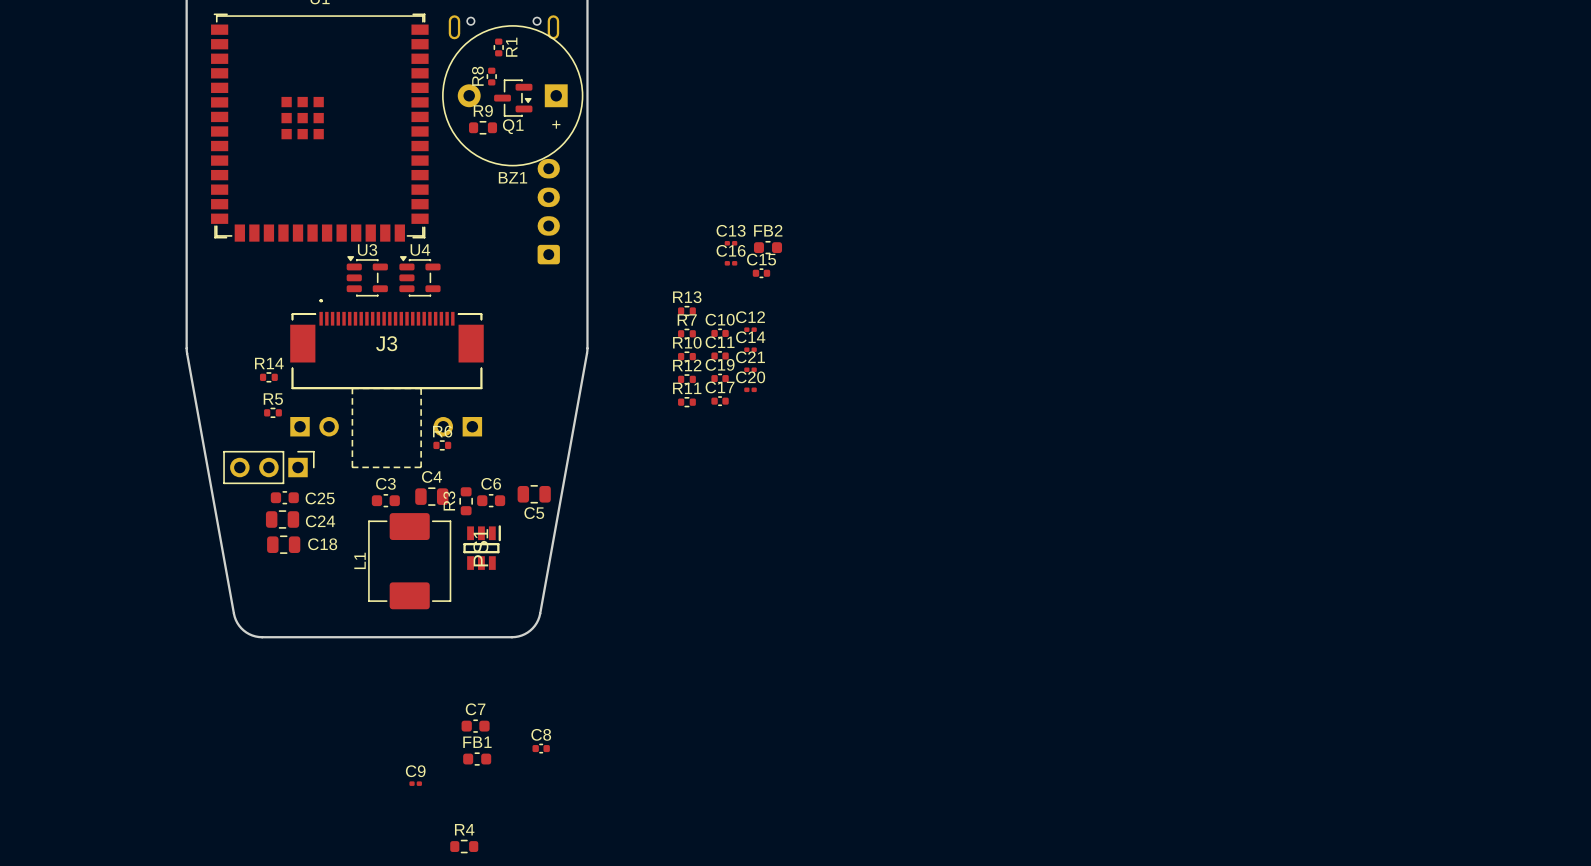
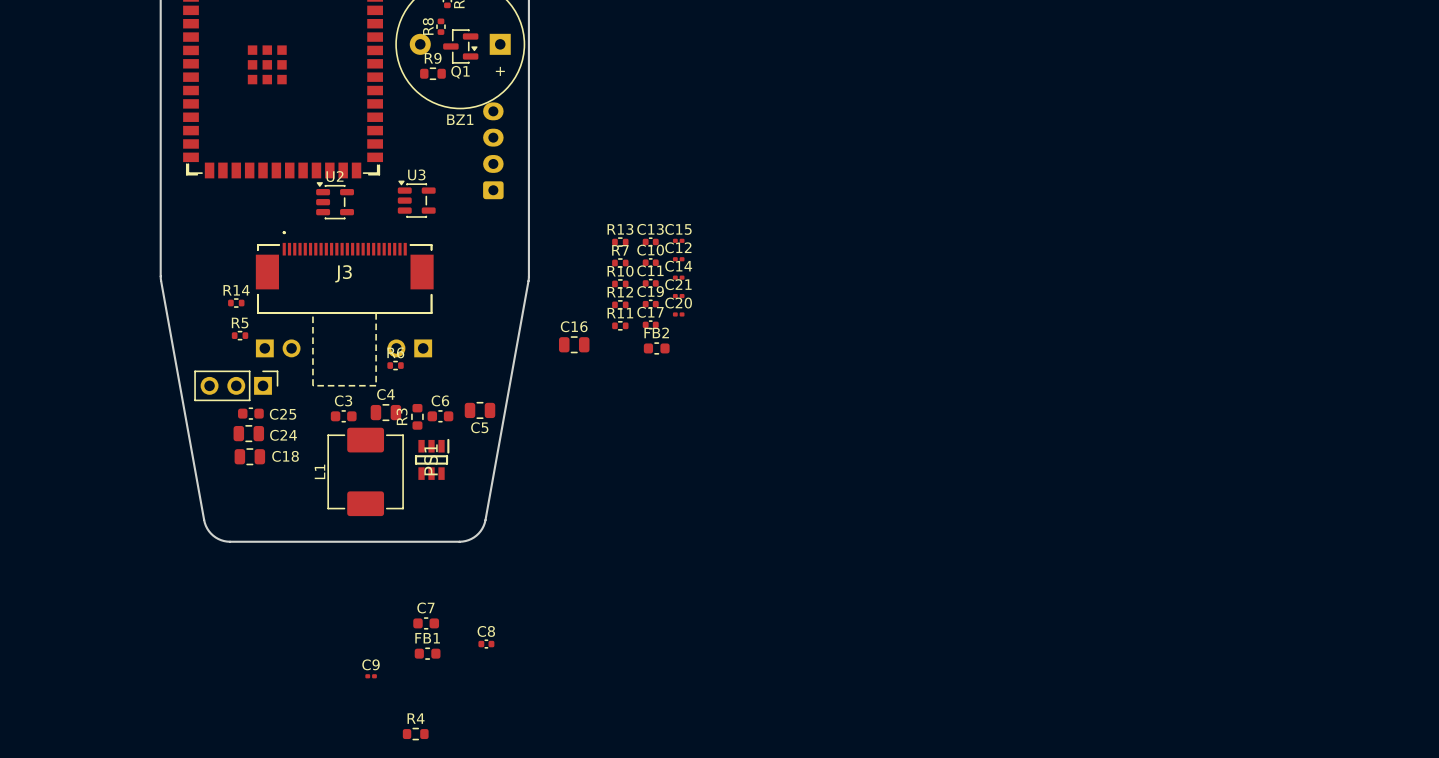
C13 footprint: [724, 240, 738, 246] -> [642, 237, 659, 247]
FB2 position: (768, 247) -> (656, 348)
C16 footprint: [724, 261, 738, 266] -> [558, 336, 590, 354]
U2: none -> (335, 200)
C15 footprint: [752, 268, 771, 279] -> [672, 238, 685, 243]
U3 position: (367, 276) -> (416, 199)
U4: (419, 276) -> none

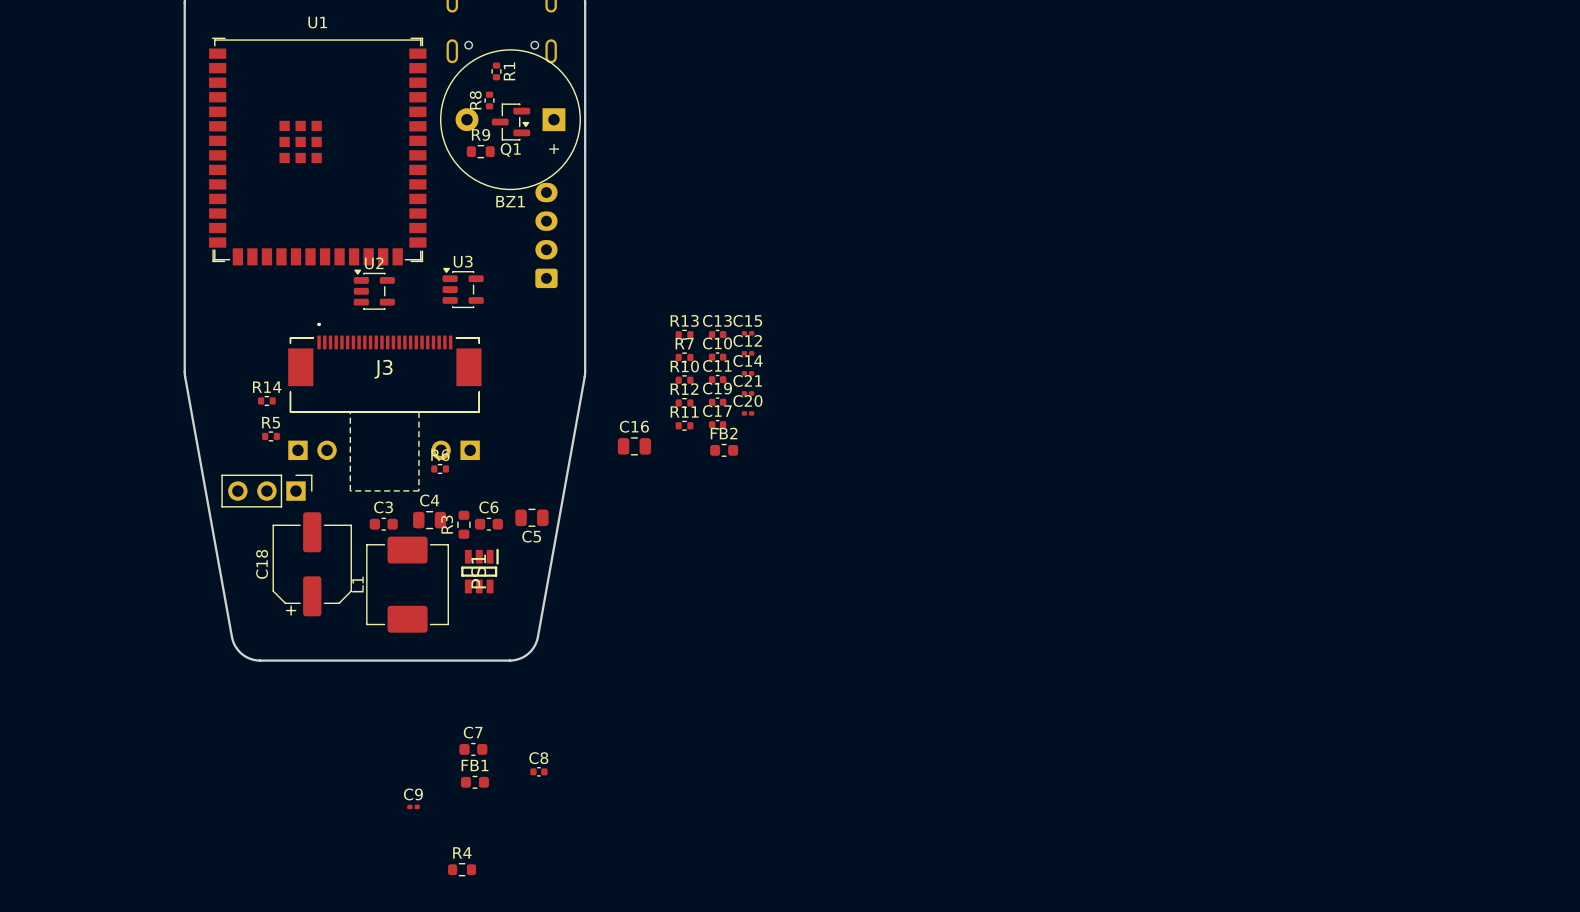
C25: (250, 413) -> none
C24: (248, 433) -> none
C18 footprint: [234, 448, 266, 466] -> [272, 512, 352, 617]
C18 name position: C18 (285, 456) -> C18 (262, 564)

